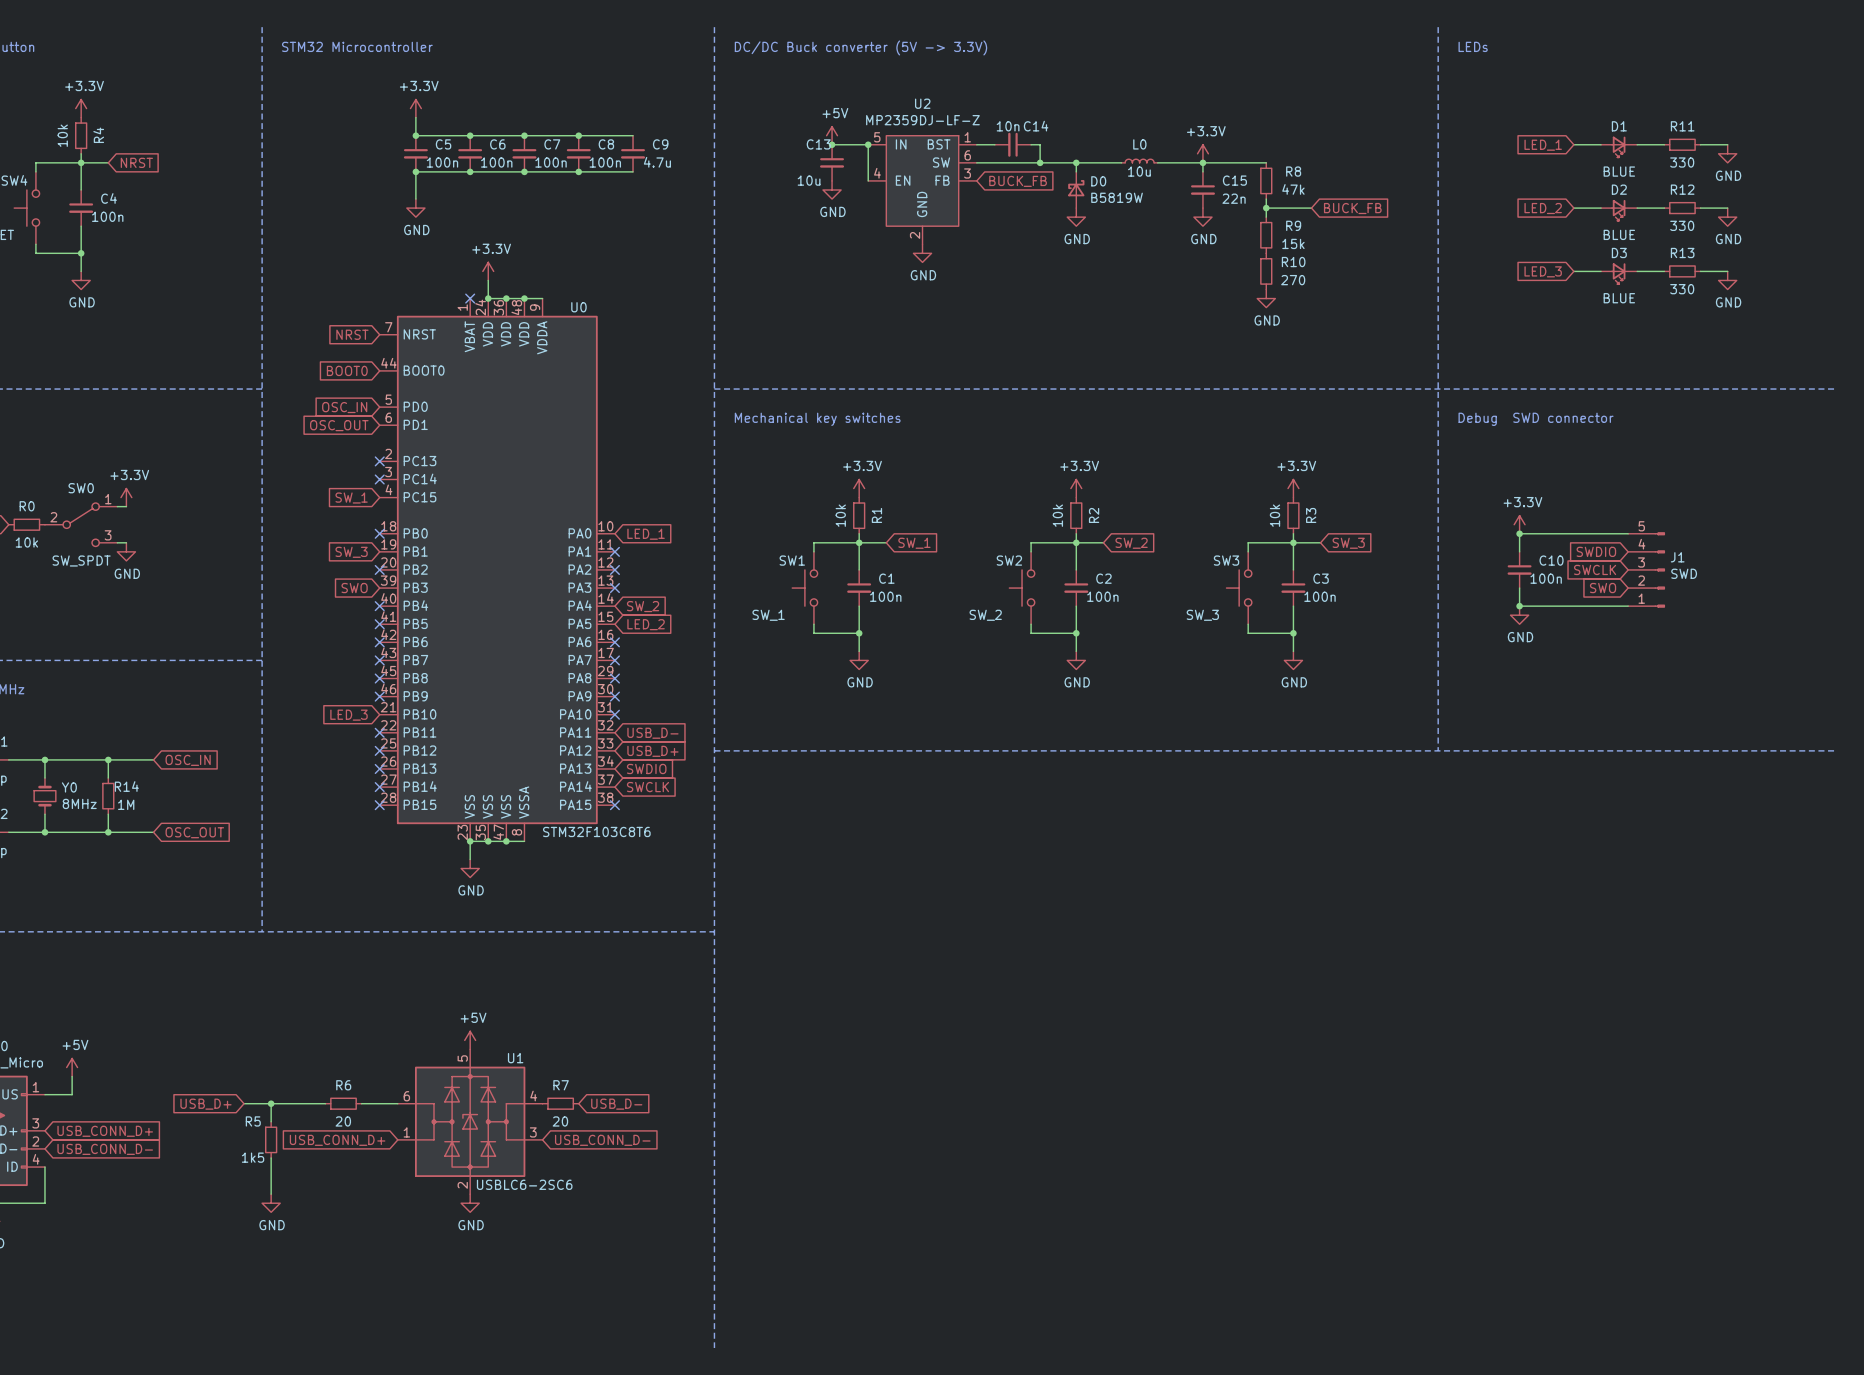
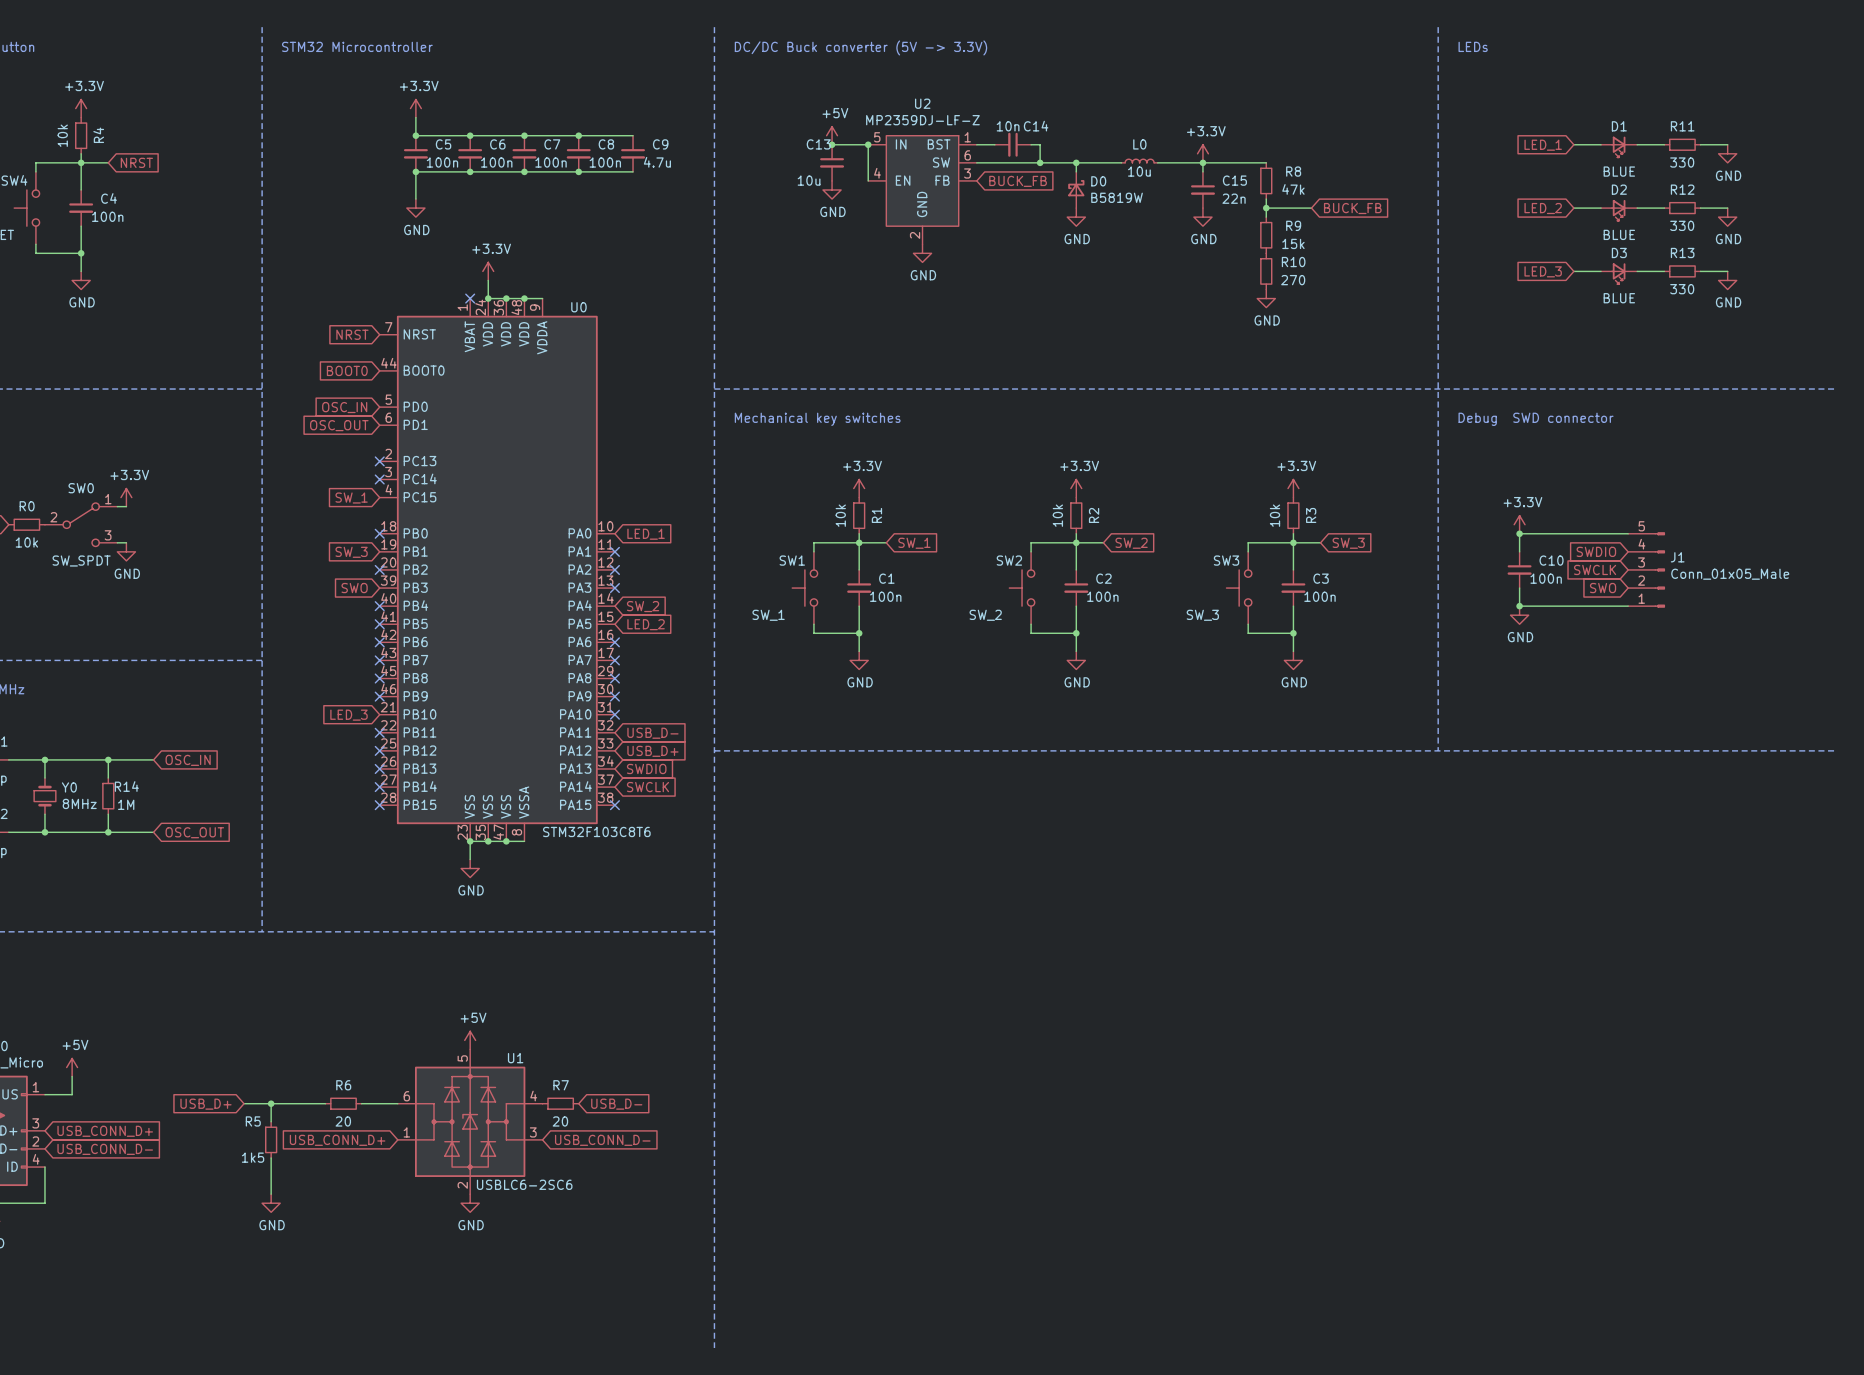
J1 value: SWD (1684, 573) -> Conn_01x05_Male (1730, 574)

